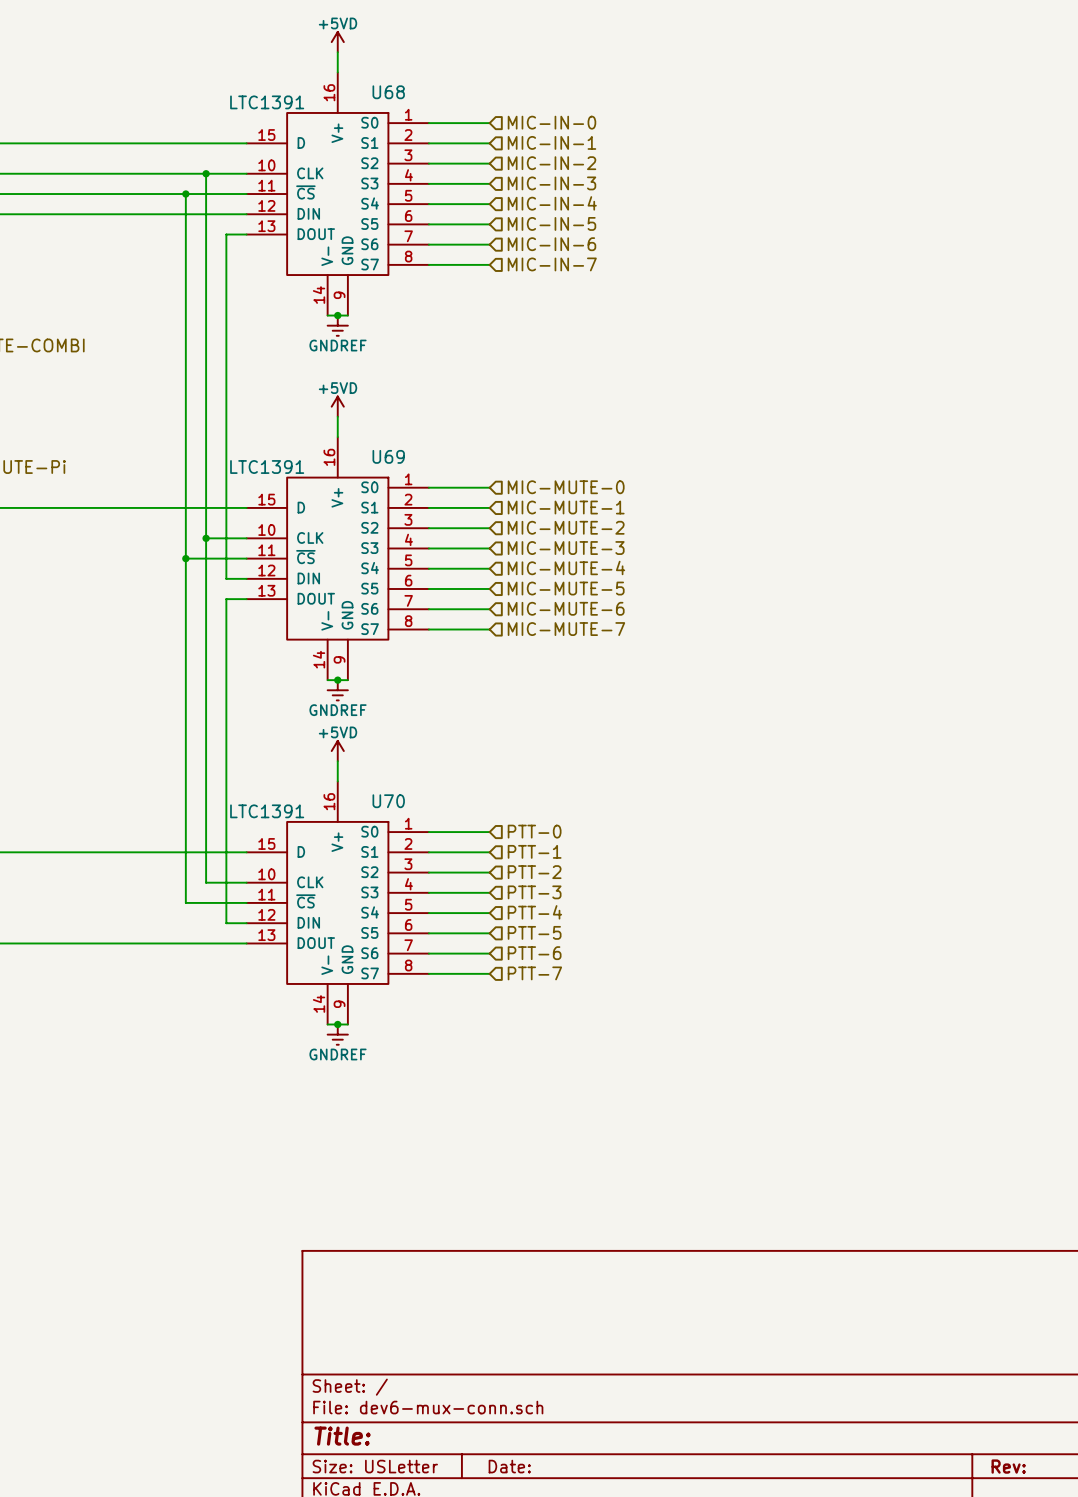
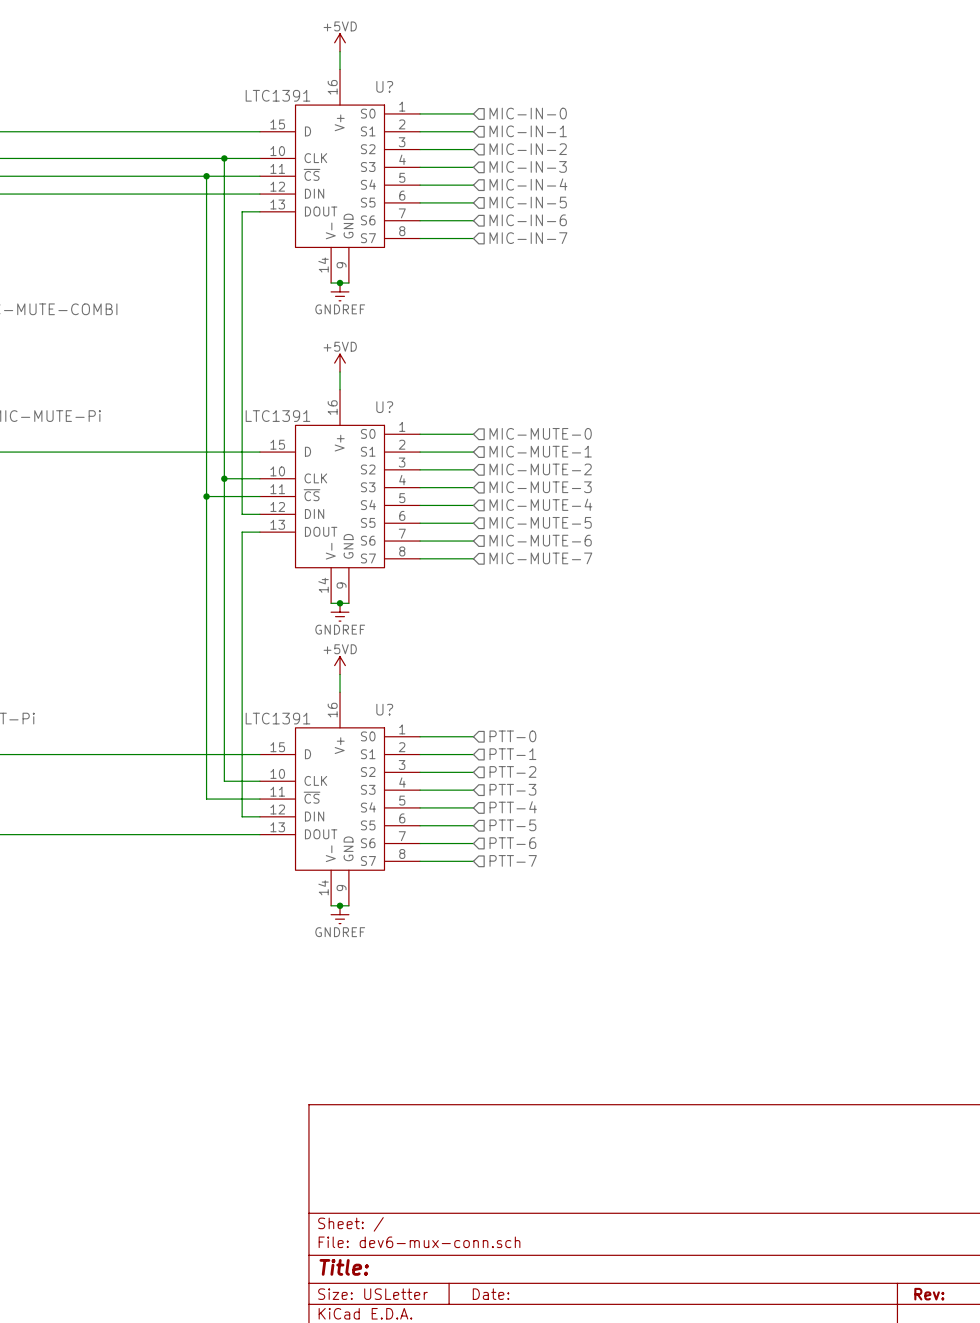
U68 name: U68 (388, 92) -> U? (384, 86)
U69 name: U69 (388, 456) -> U? (384, 407)
U70 name: U70 (388, 801) -> U? (384, 709)

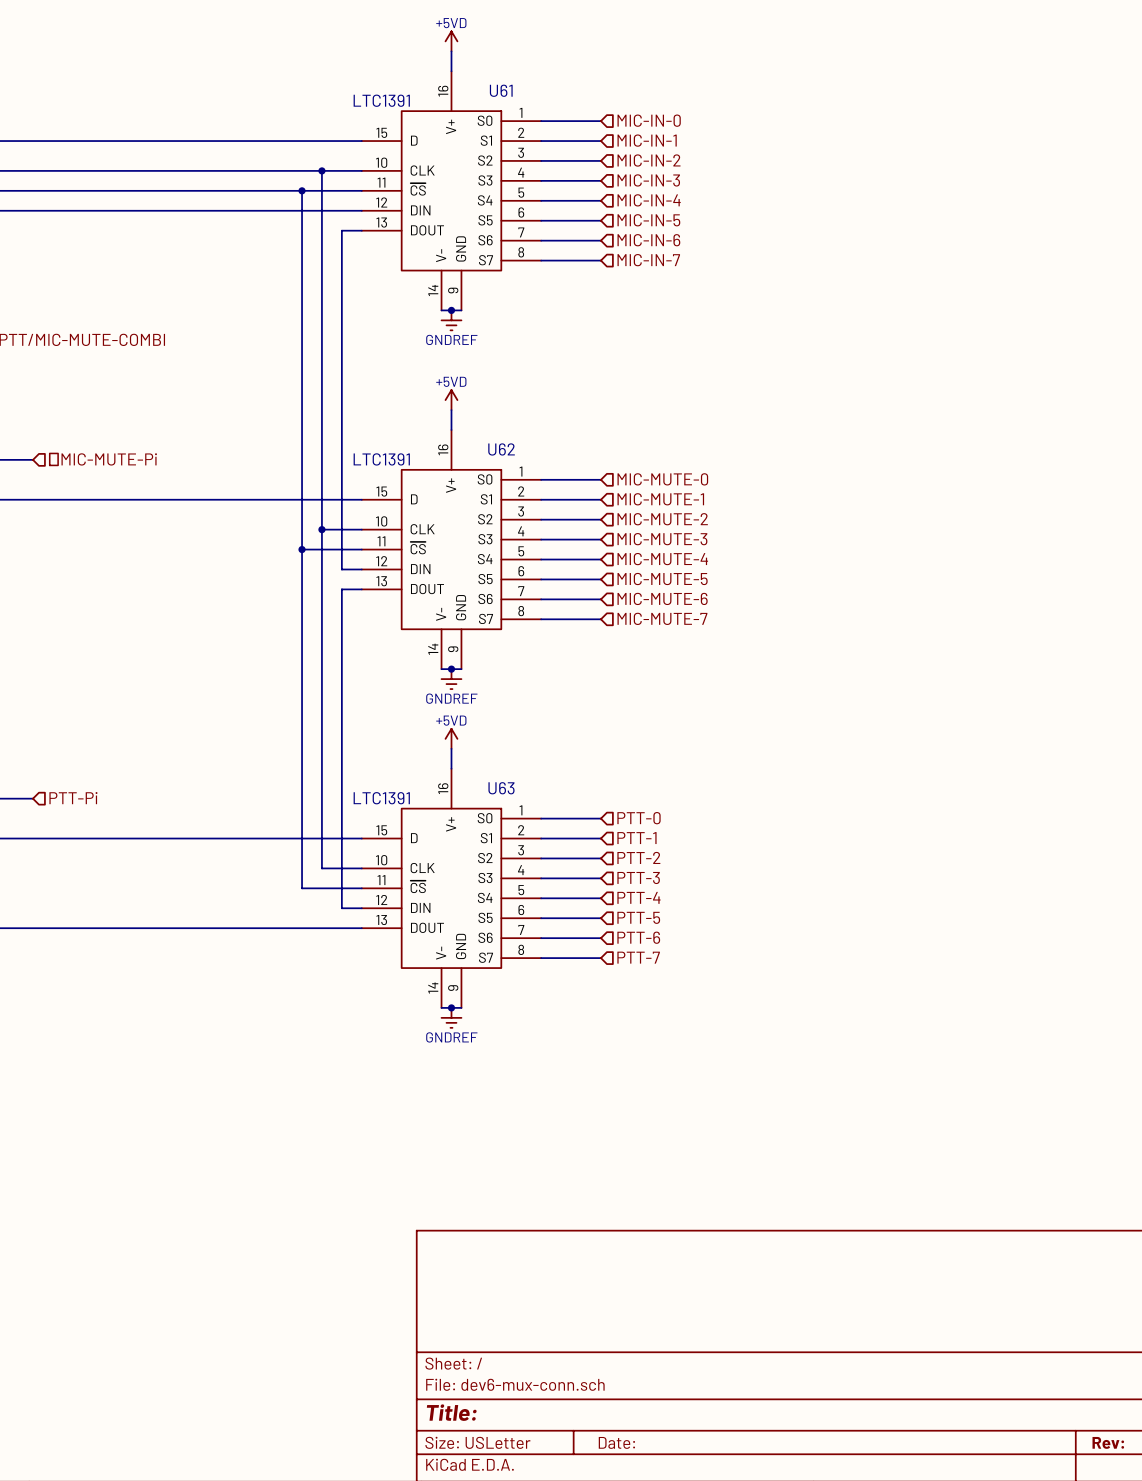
U? name: U? (384, 86) -> U61 (501, 90)
U? name: U? (384, 407) -> U62 (501, 449)
U? name: U? (384, 709) -> U63 (501, 788)

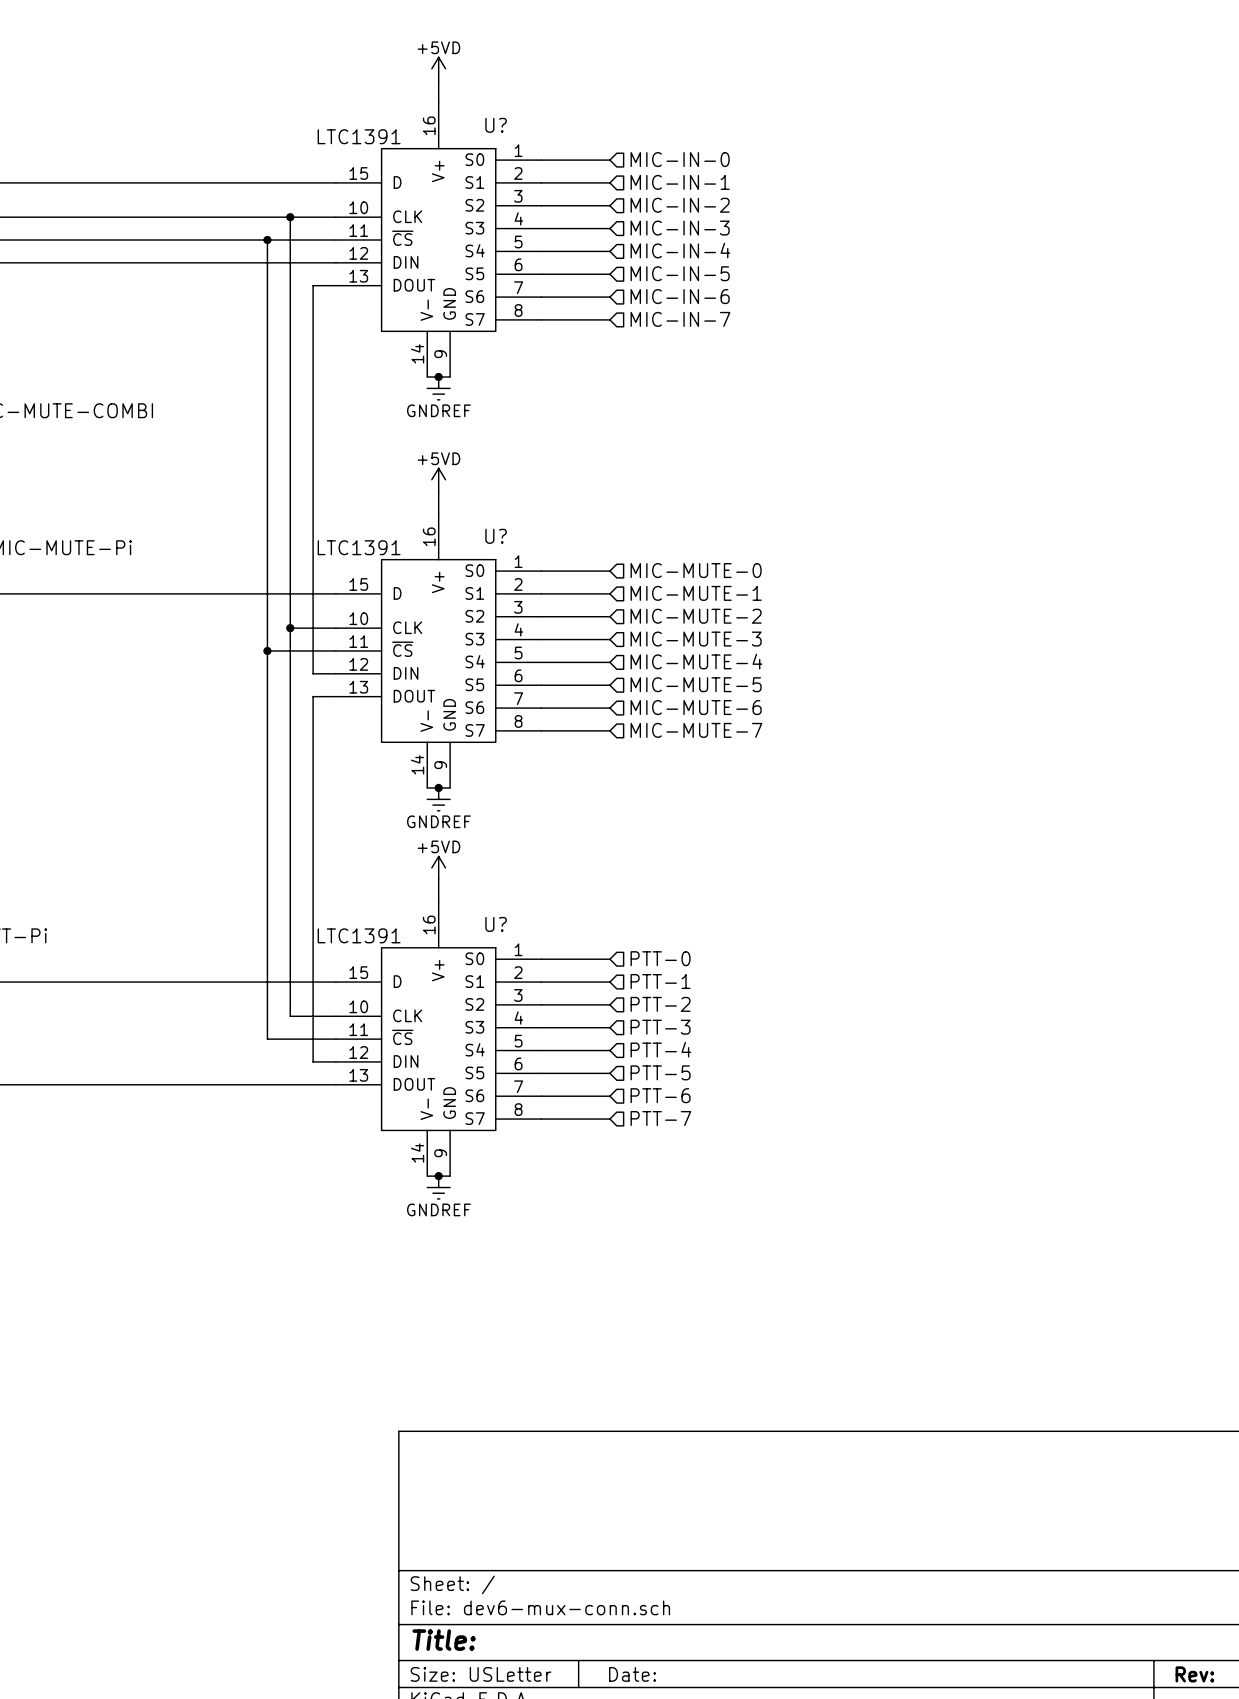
U61 name: U61 (501, 90) -> U? (496, 125)
U62 name: U62 (501, 449) -> U? (496, 536)
U63 name: U63 (501, 788) -> U? (496, 924)

